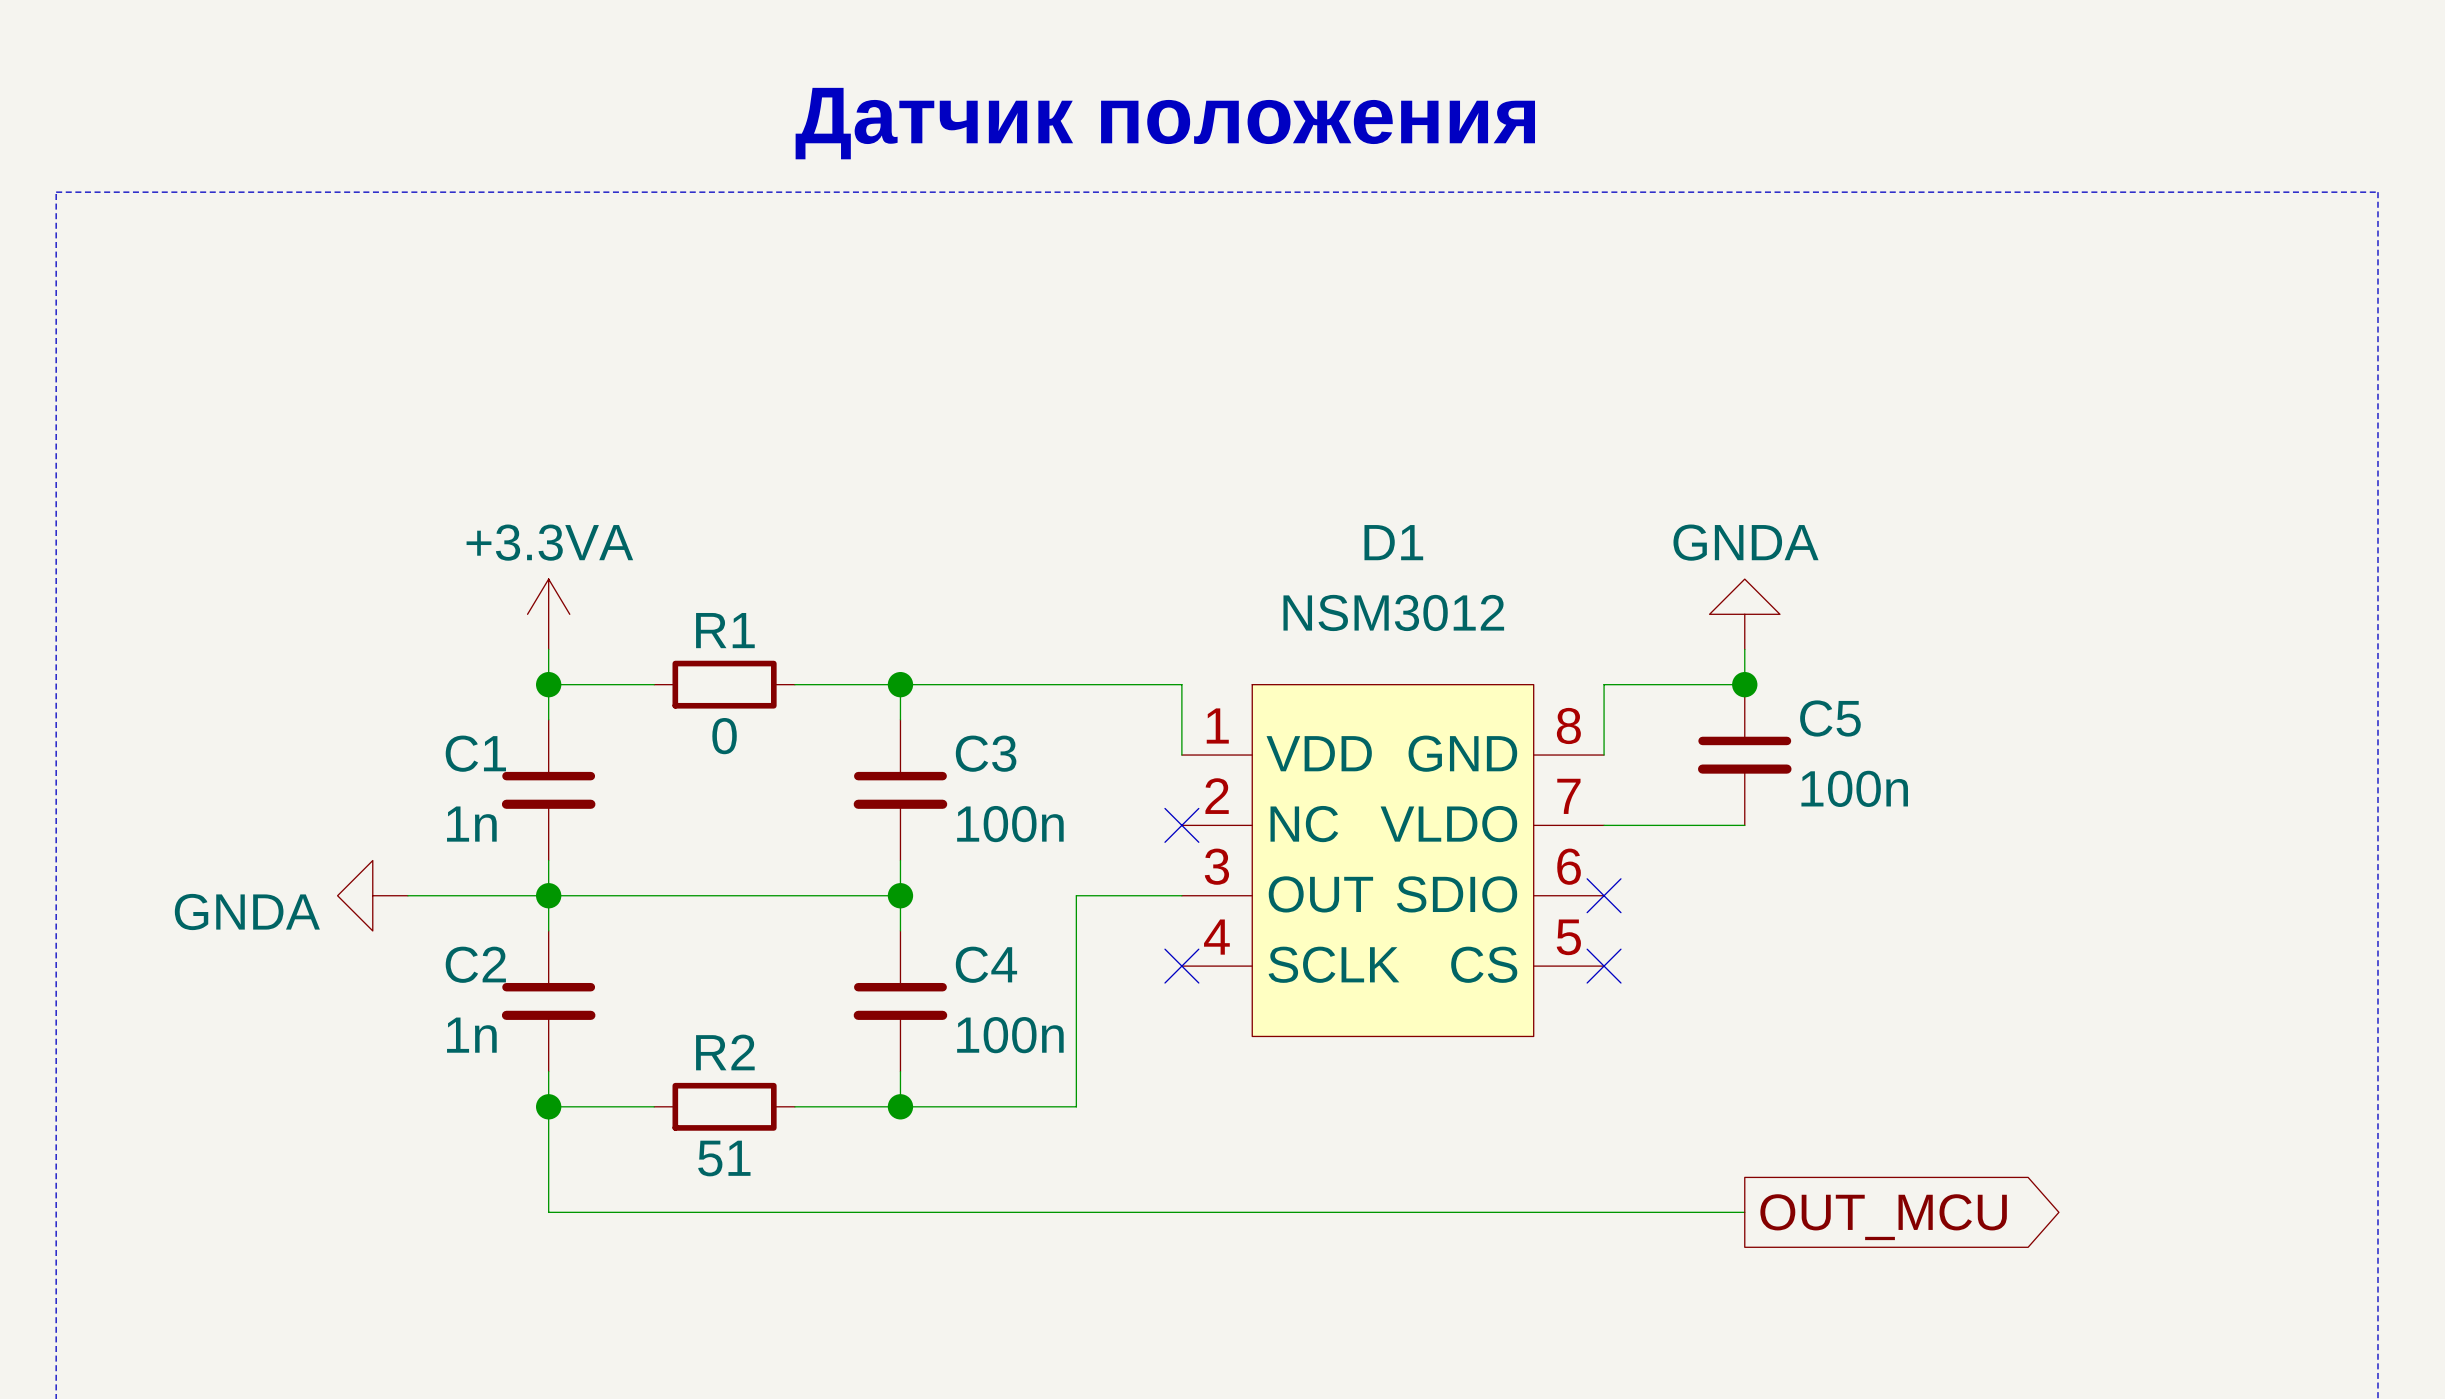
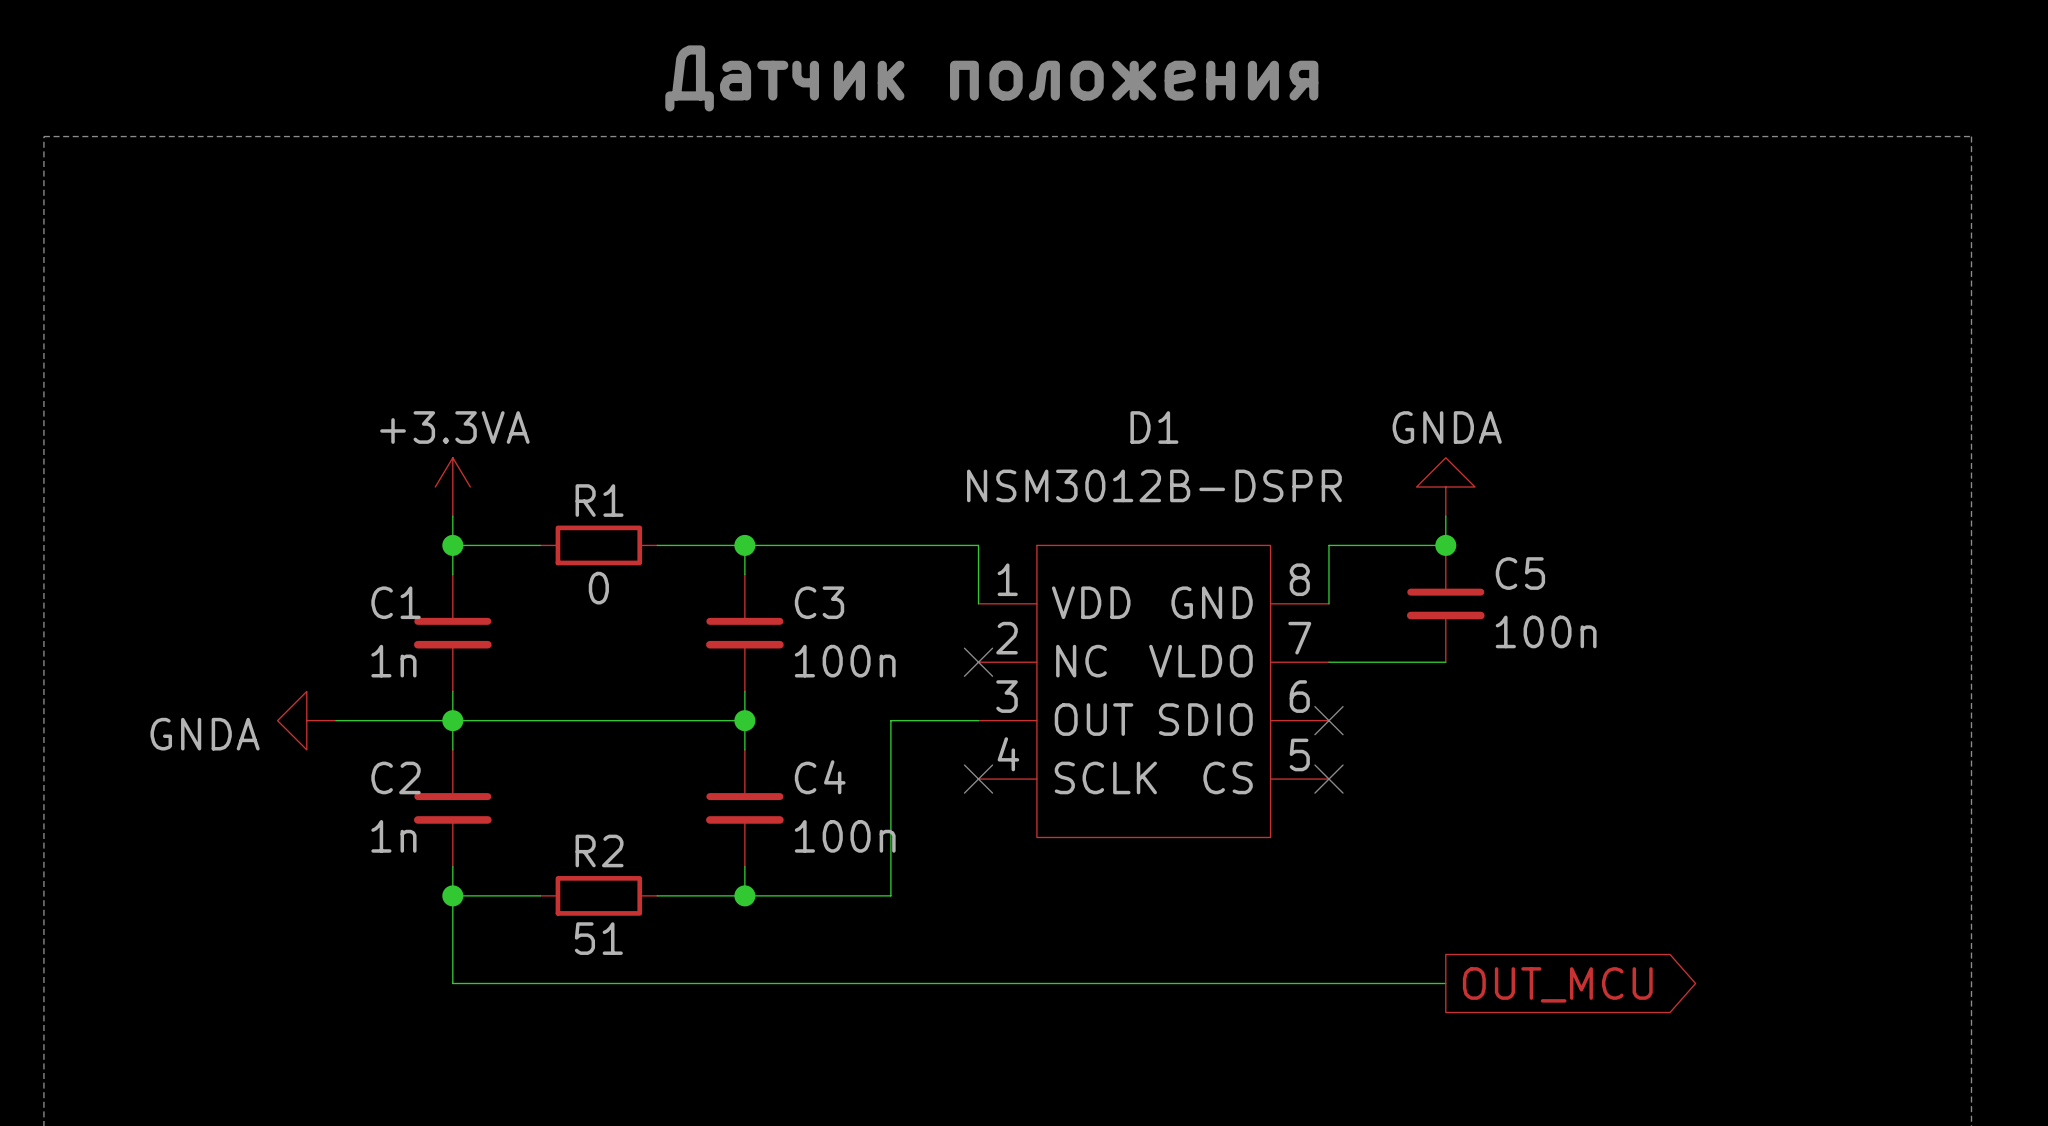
D1 value: NSM3012 (1393, 612) -> NSM3012B-DSPR (1154, 485)

